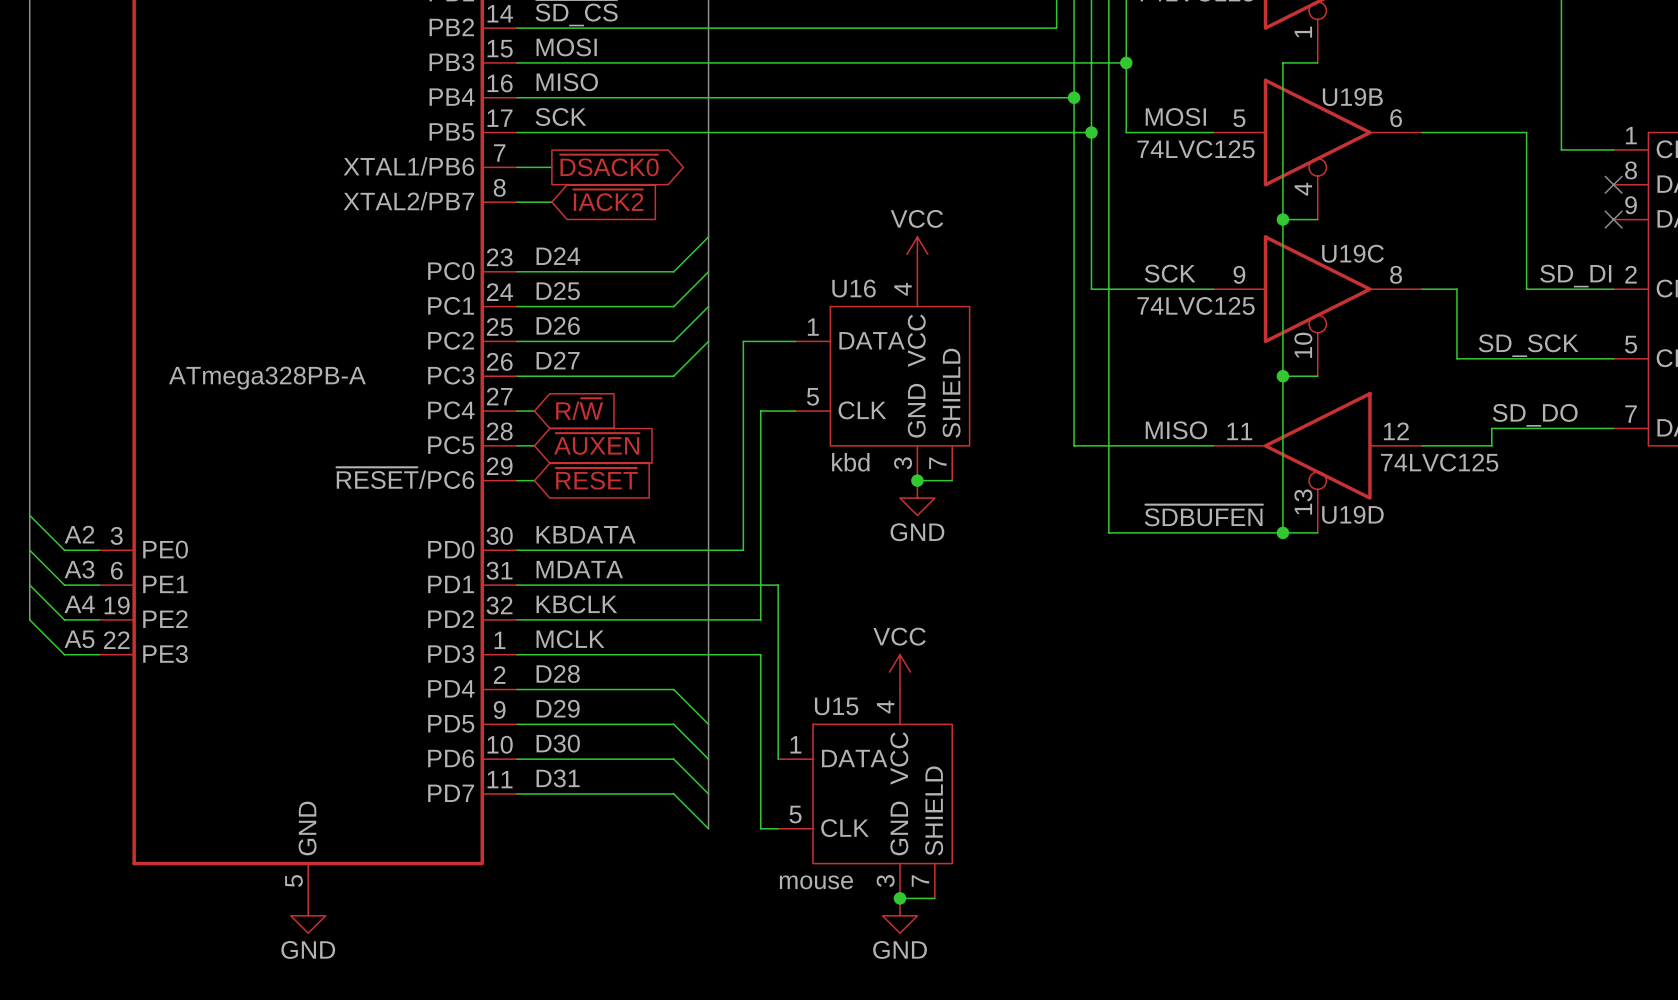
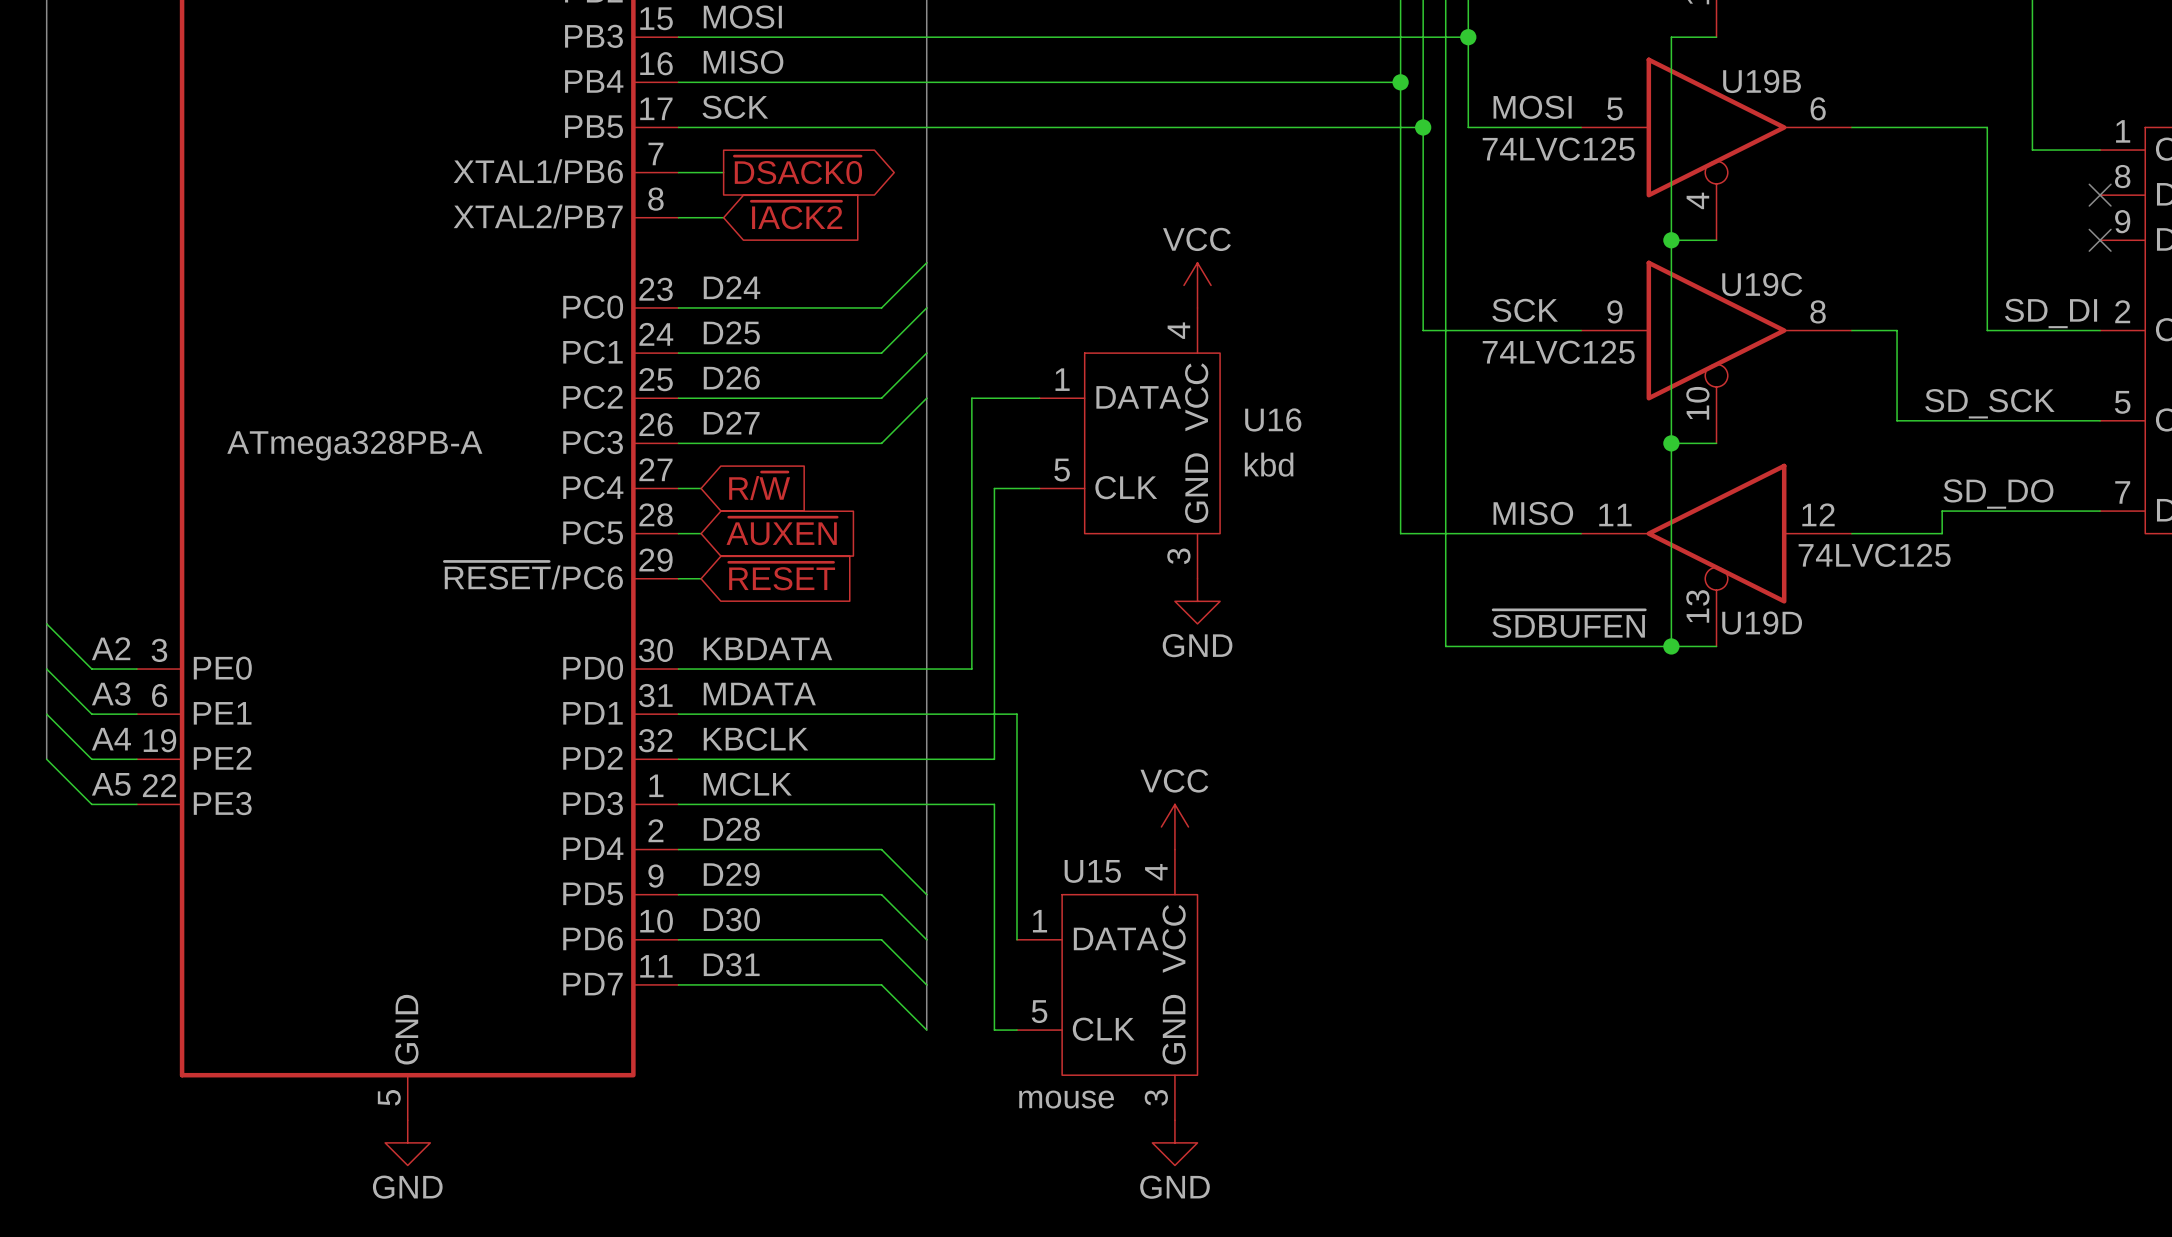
U16 symbol: [795, 271, 970, 481] -> [1039, 307, 1221, 579]
U16 name position: U16 (854, 288) -> U16 (1273, 419)
U16 value position: kbd (850, 462) -> kbd (1269, 464)
wire: (917, 480) (952, 480) -> none
junction: (917, 480) -> none
U15 symbol: [778, 689, 953, 899] -> [1016, 849, 1198, 1121]
wire: (900, 898) (934, 898) -> none
junction: (900, 898) -> none

